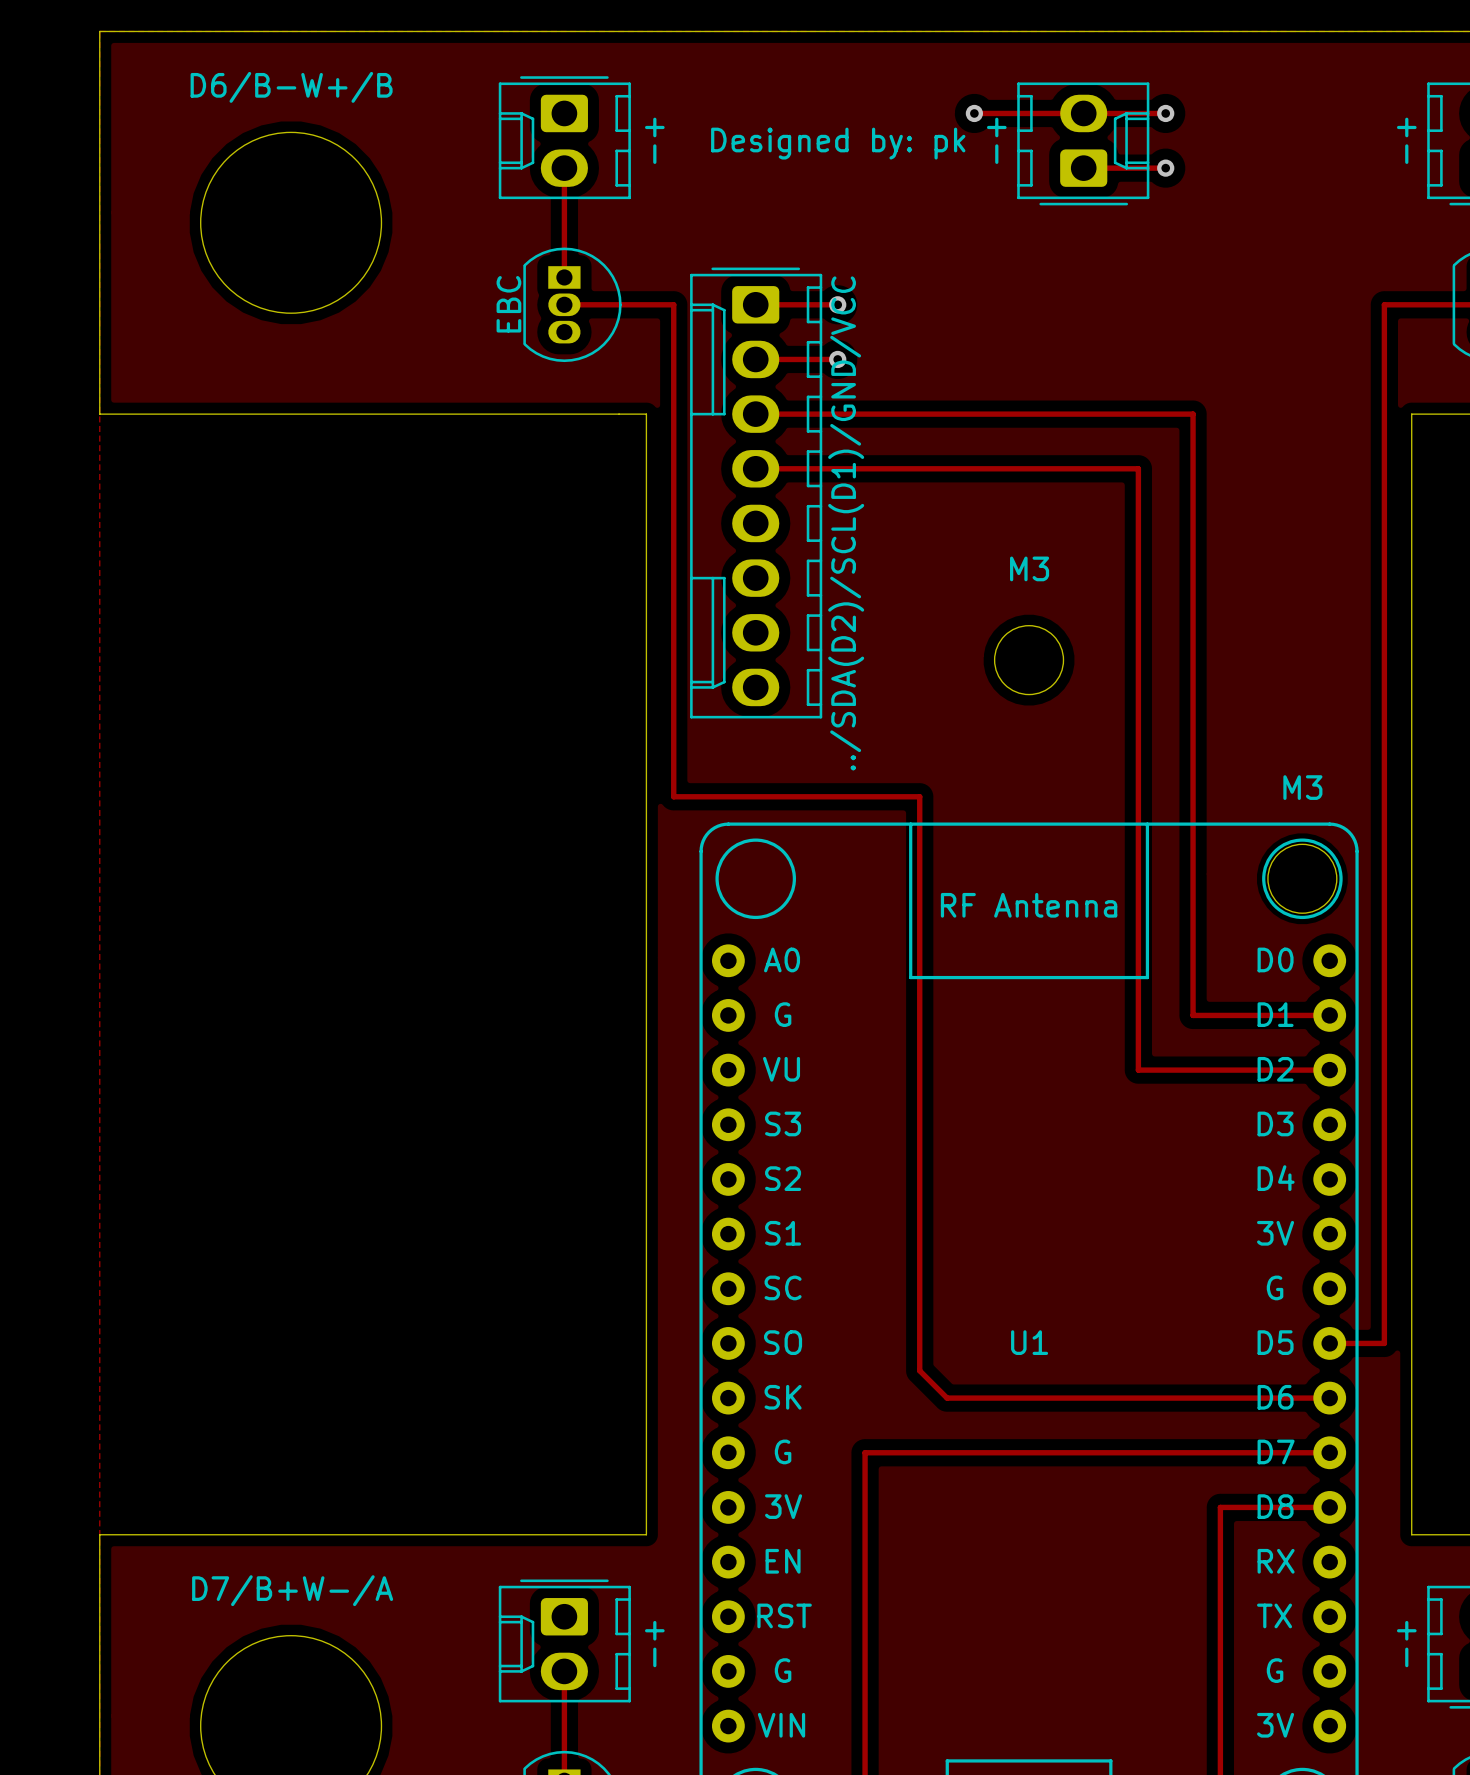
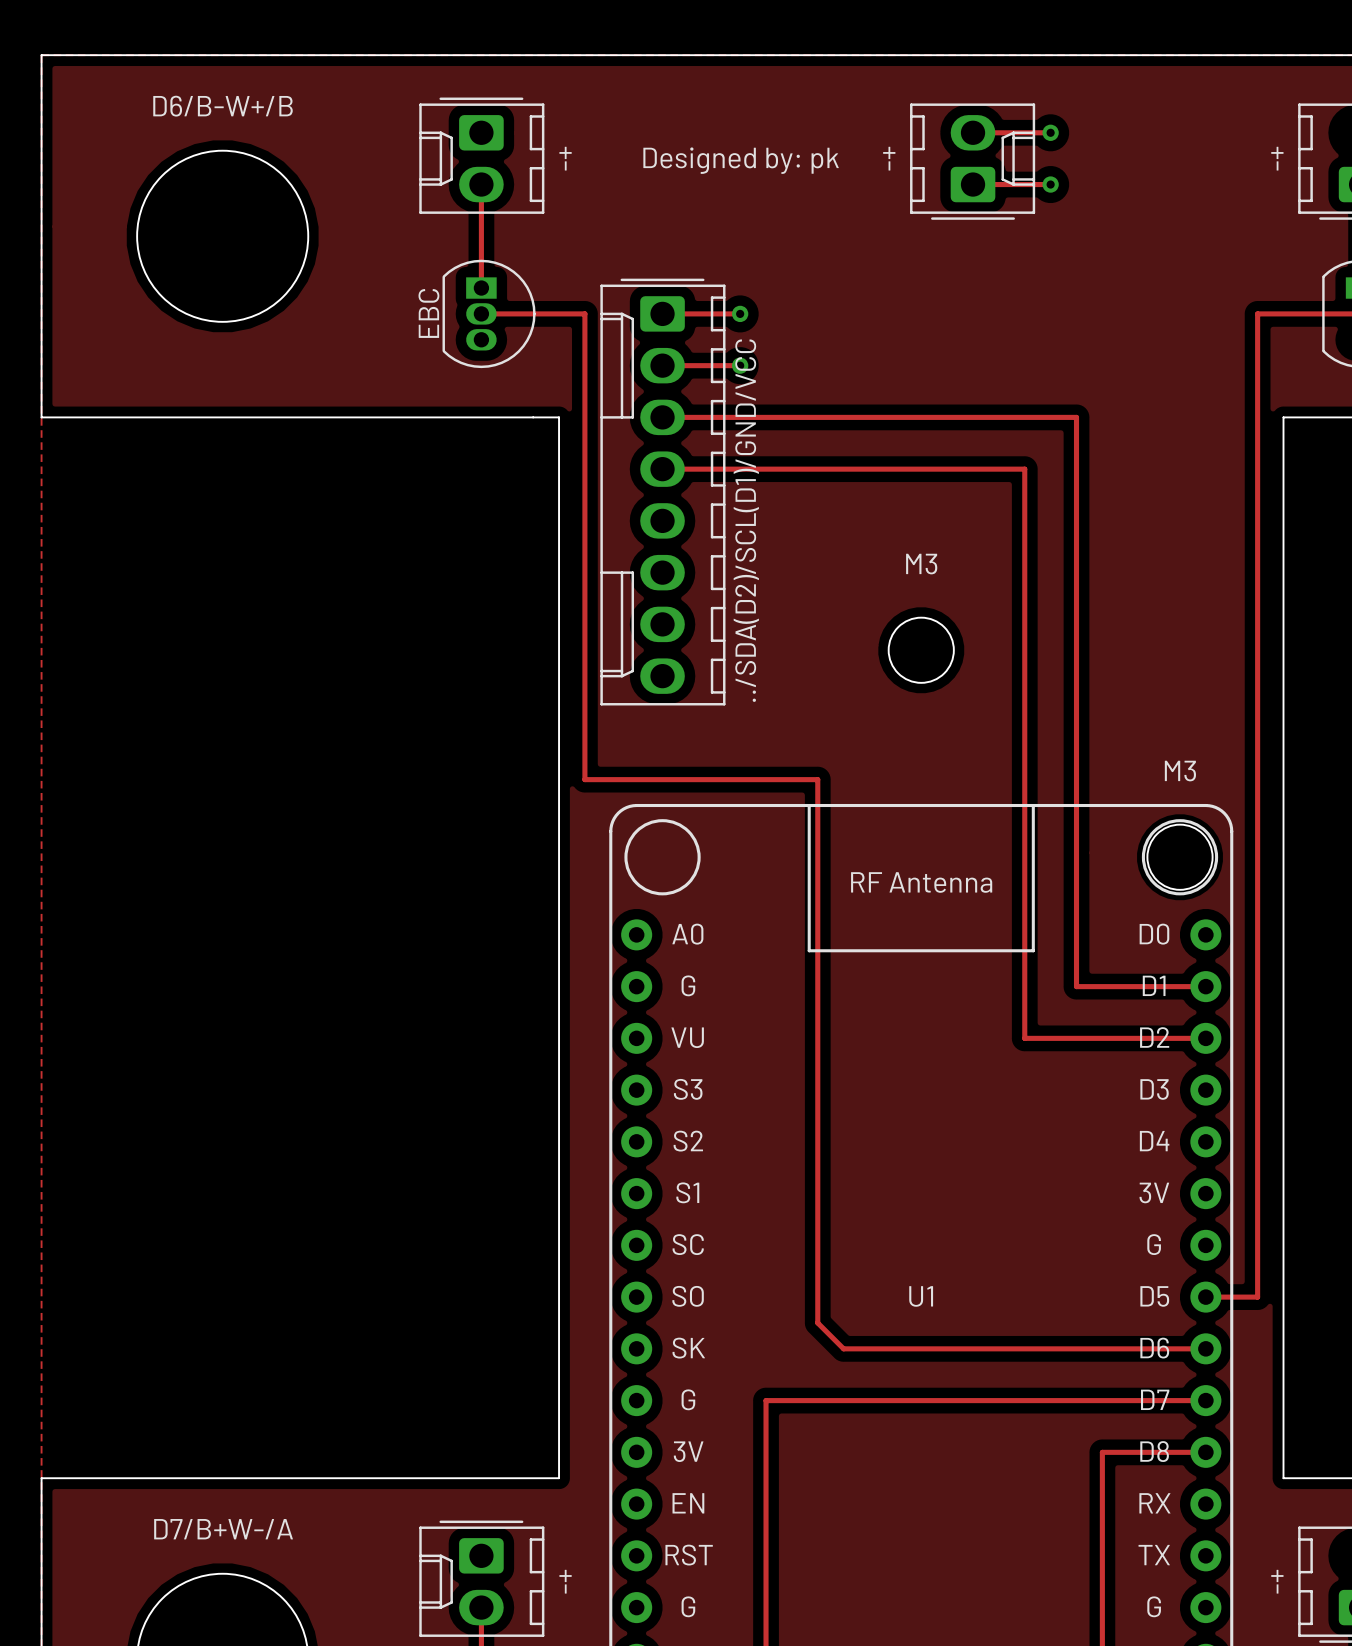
track: (974, 113) (1083, 113) -> none
via: (974, 113) -> none

